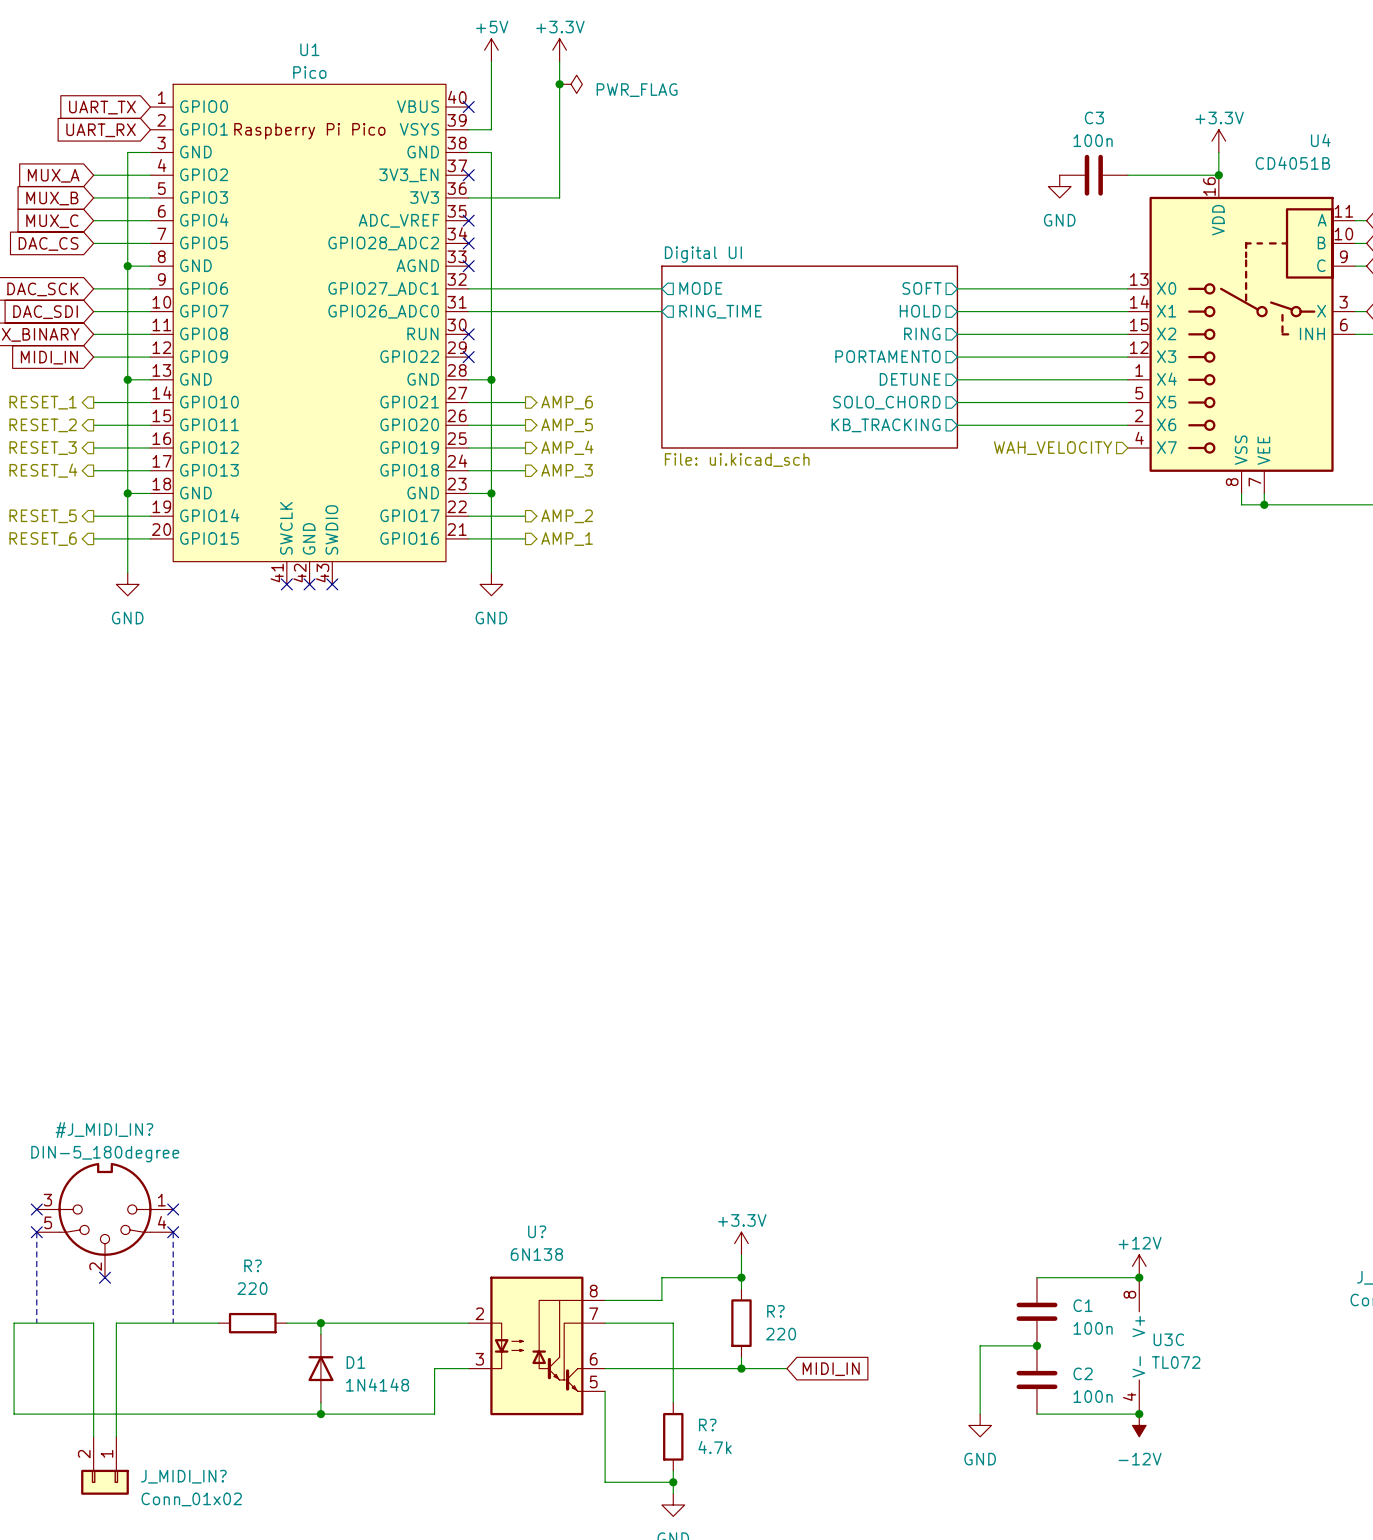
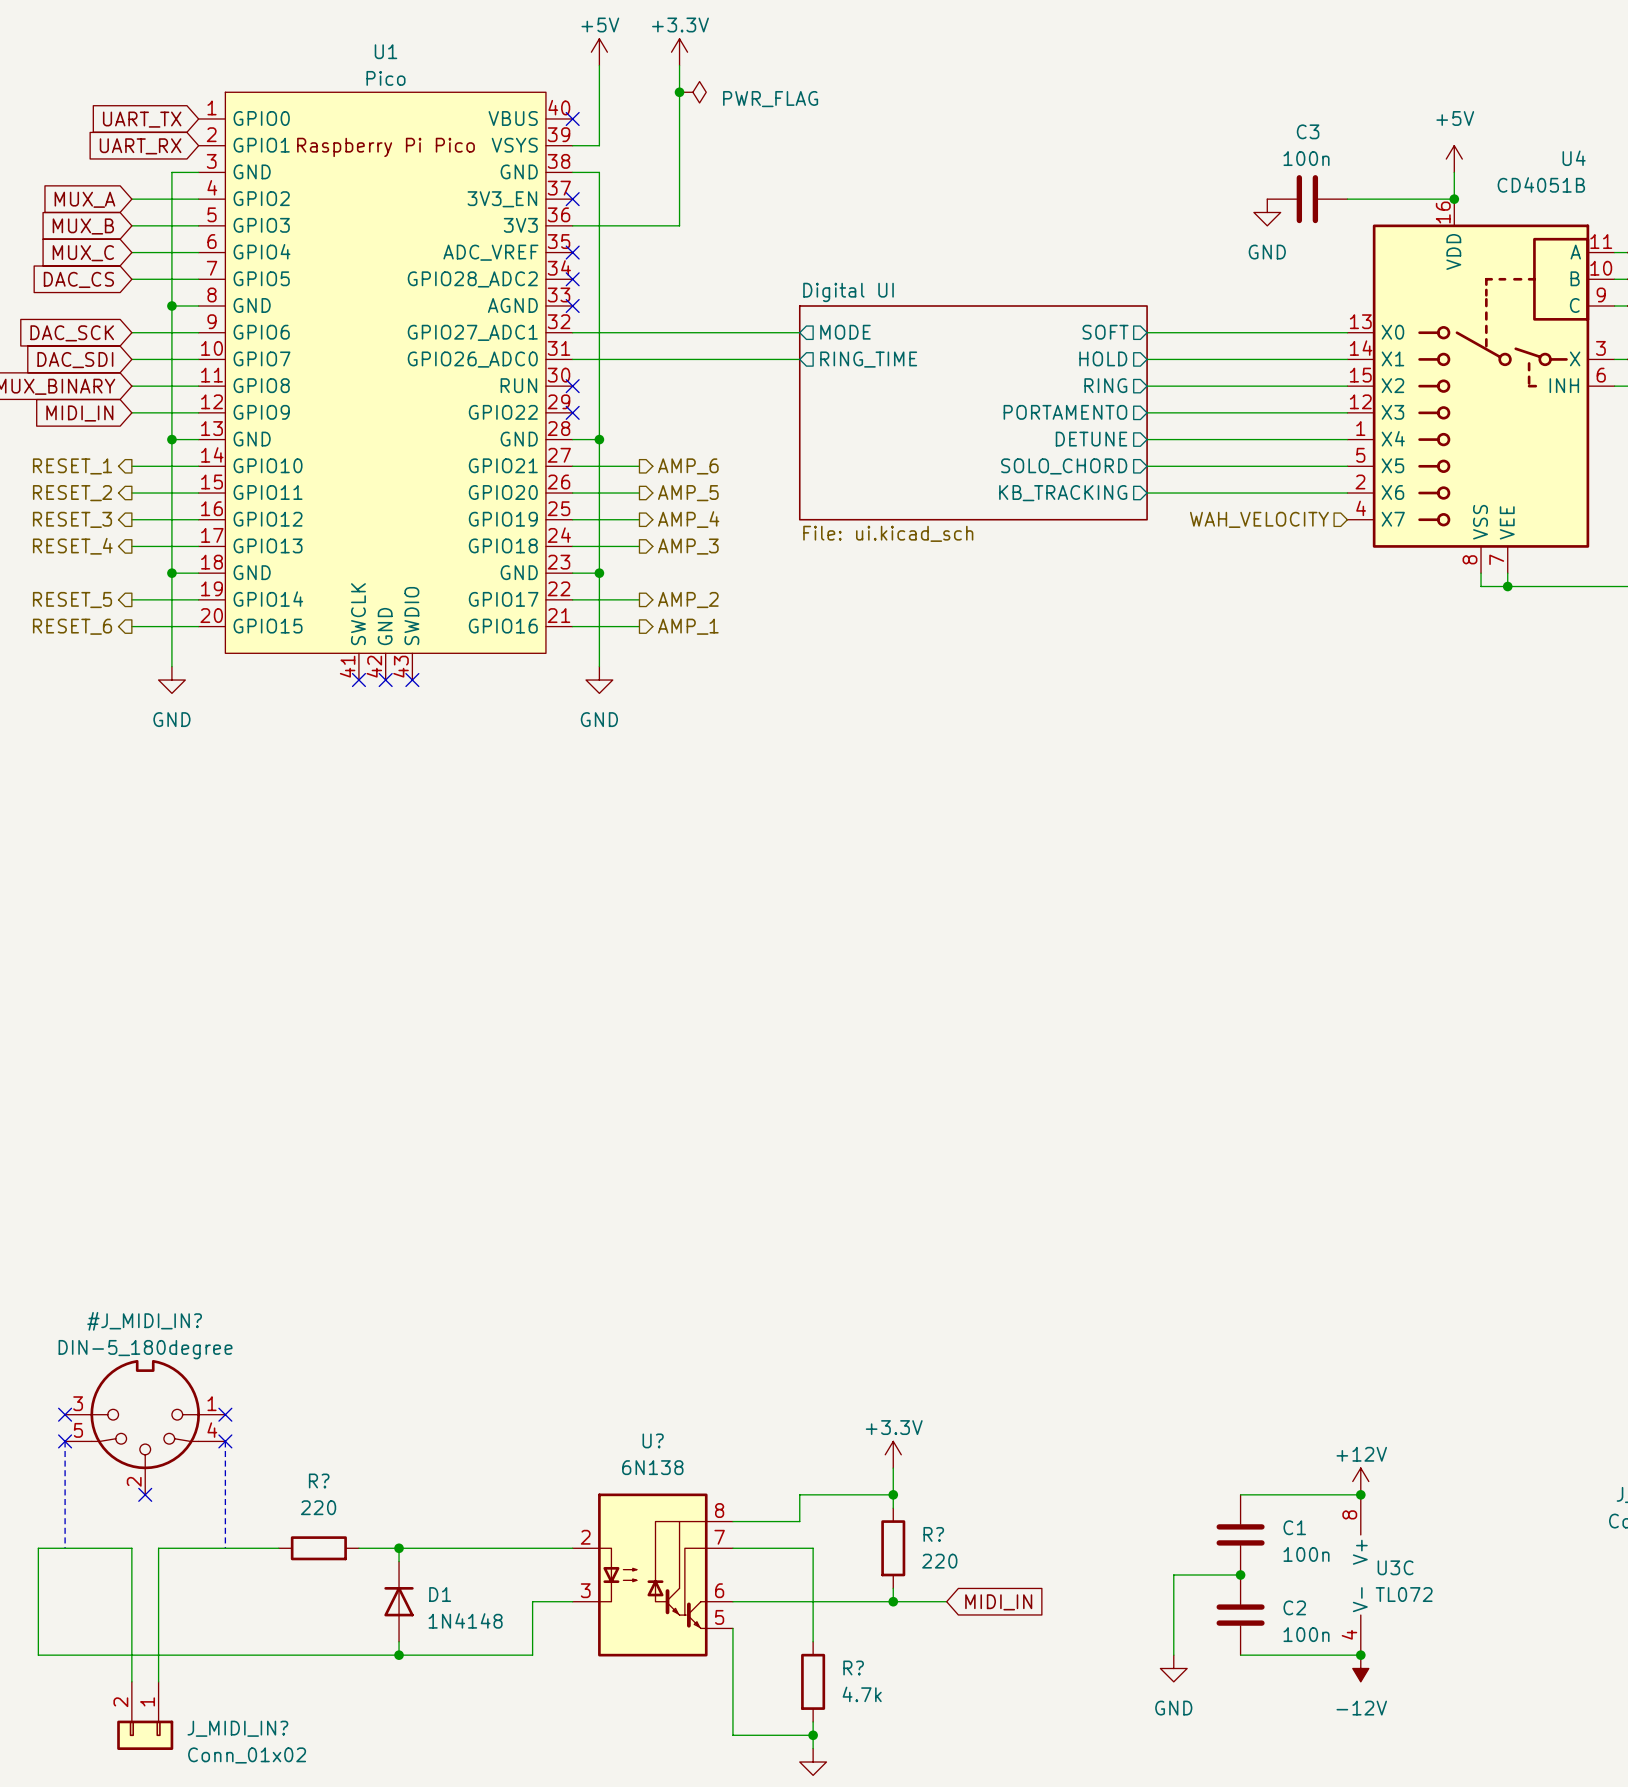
power symbol: +3.3V (1218, 141) -> +5V (1454, 159)

